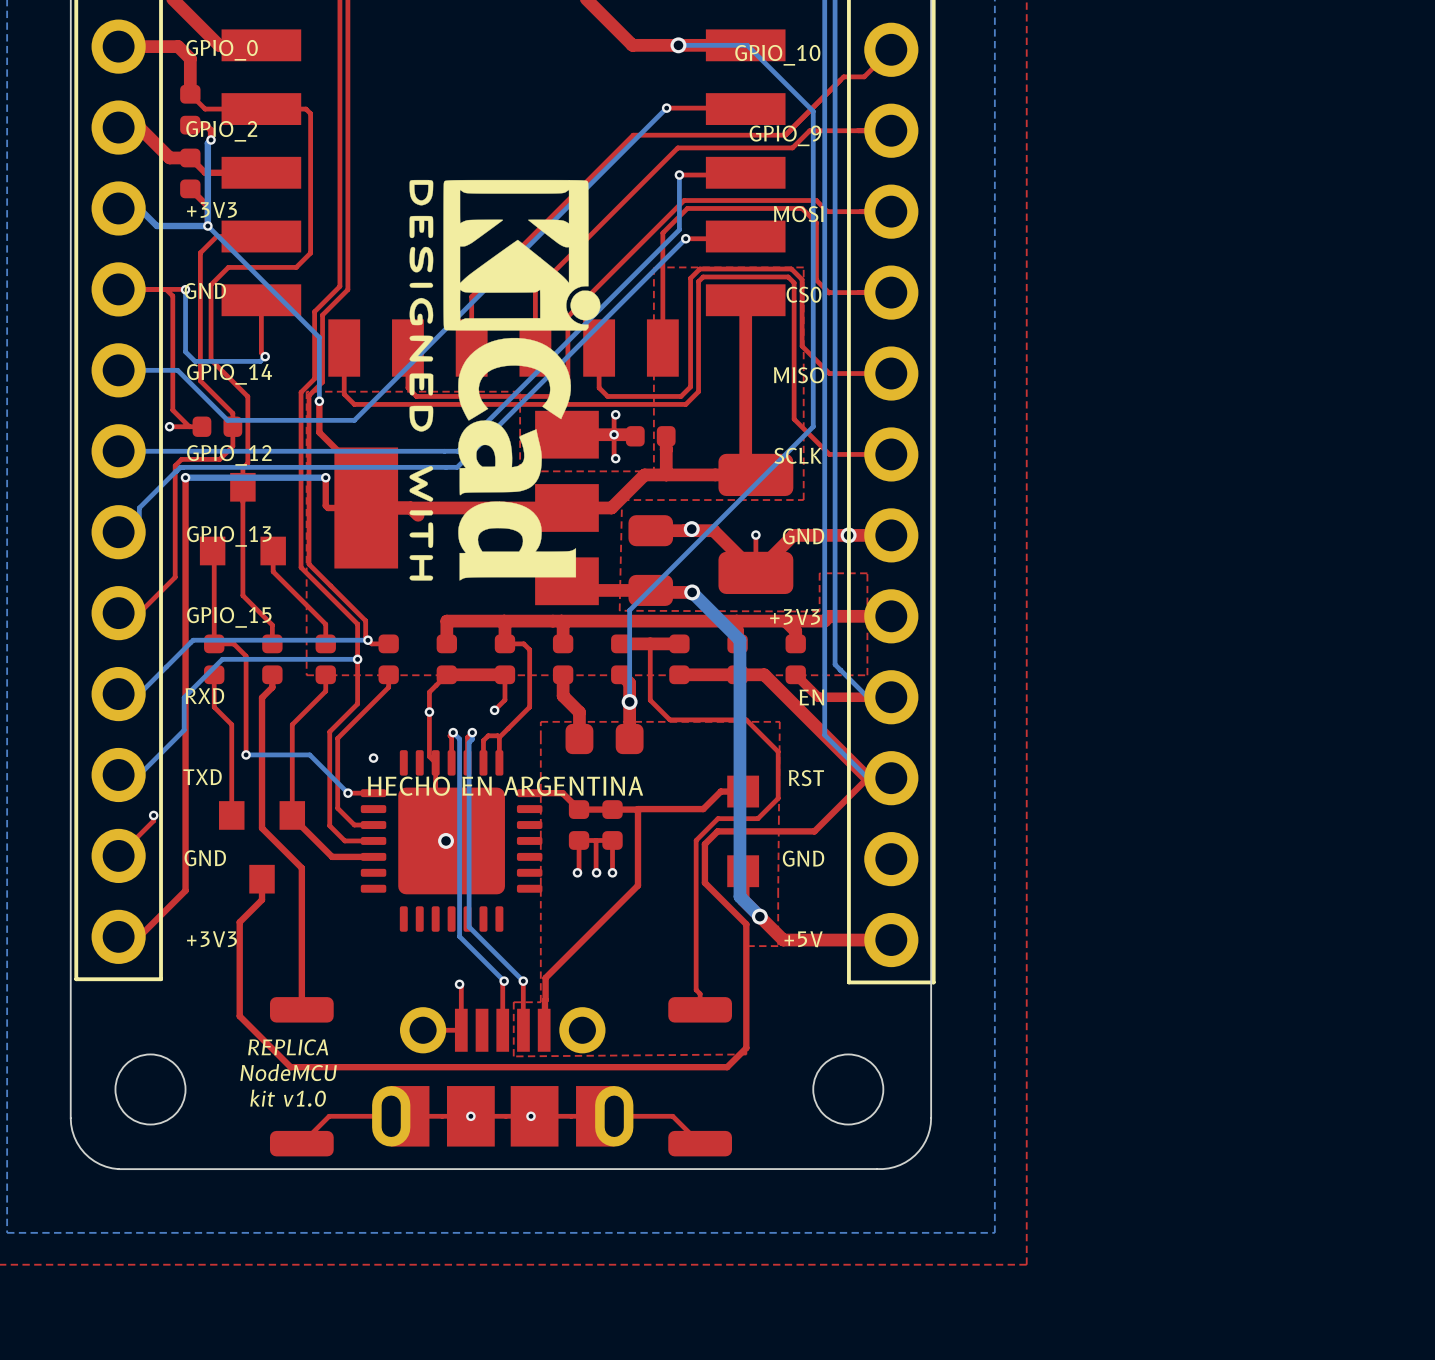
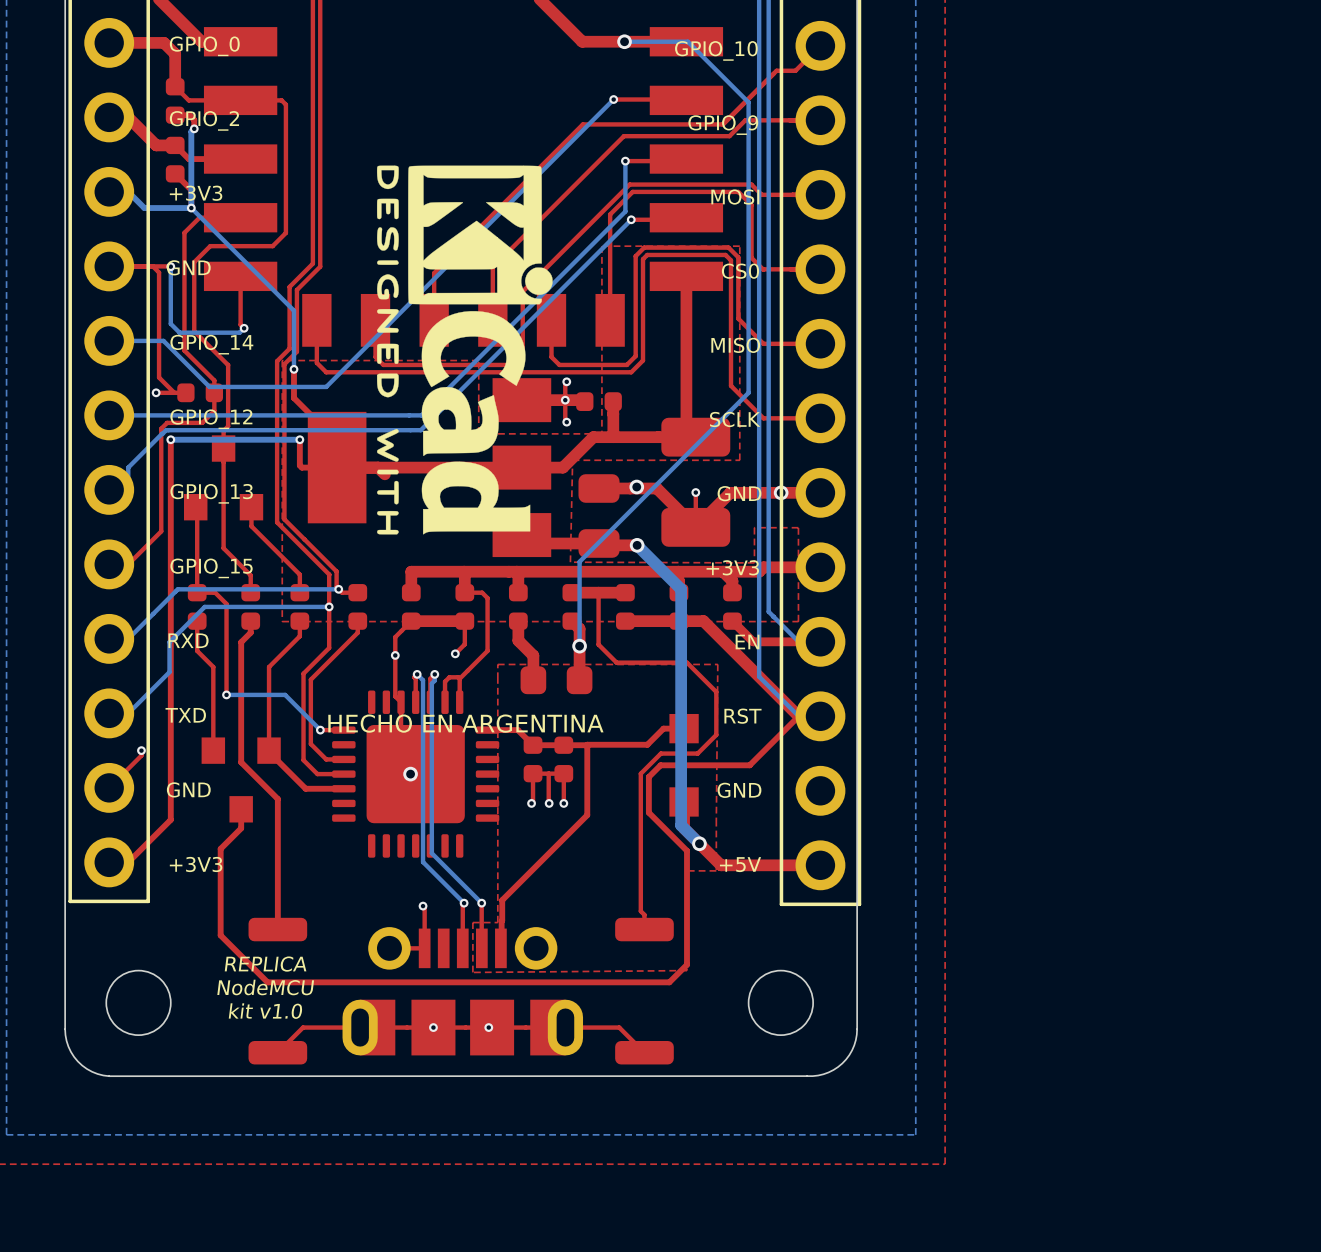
via: (373, 758) -> none

